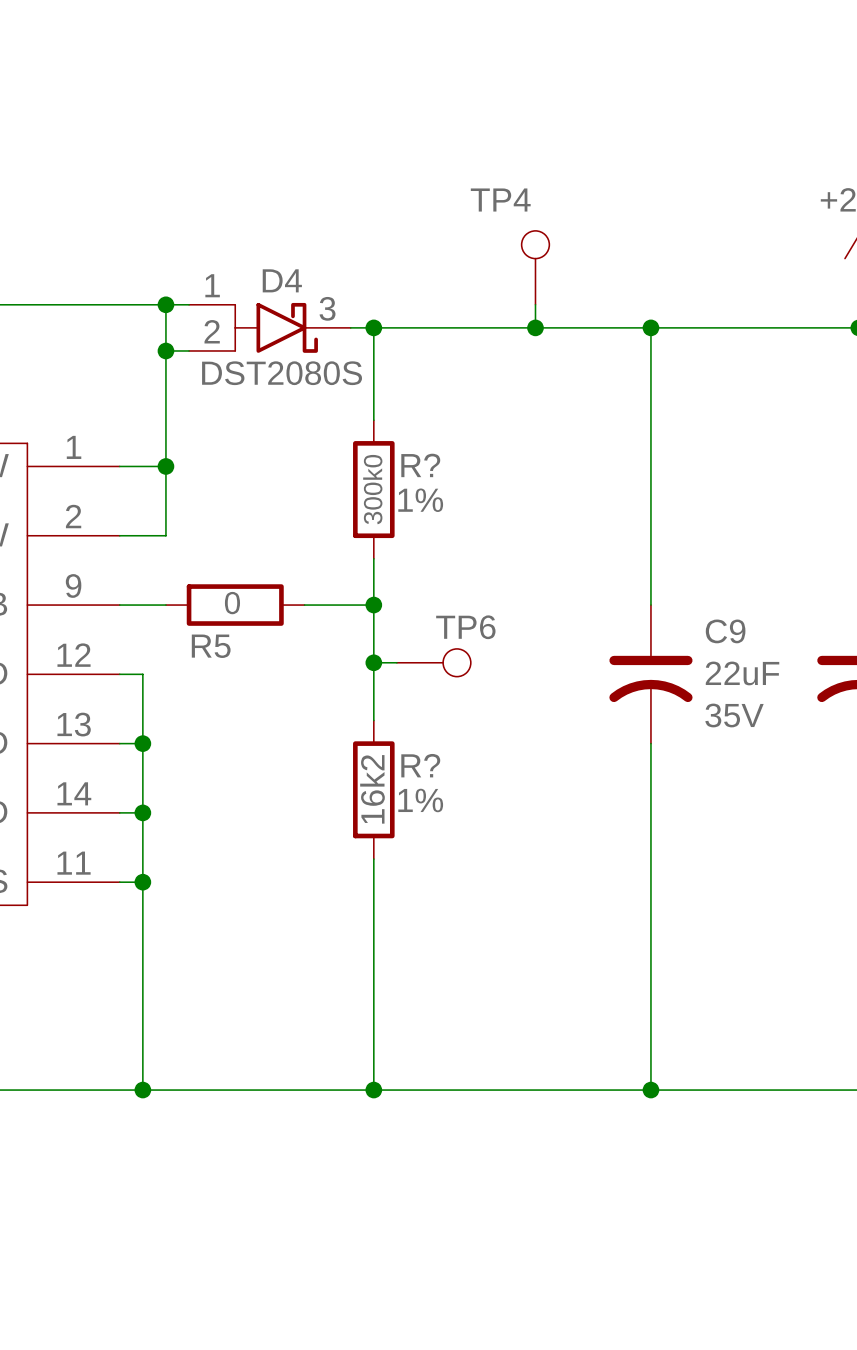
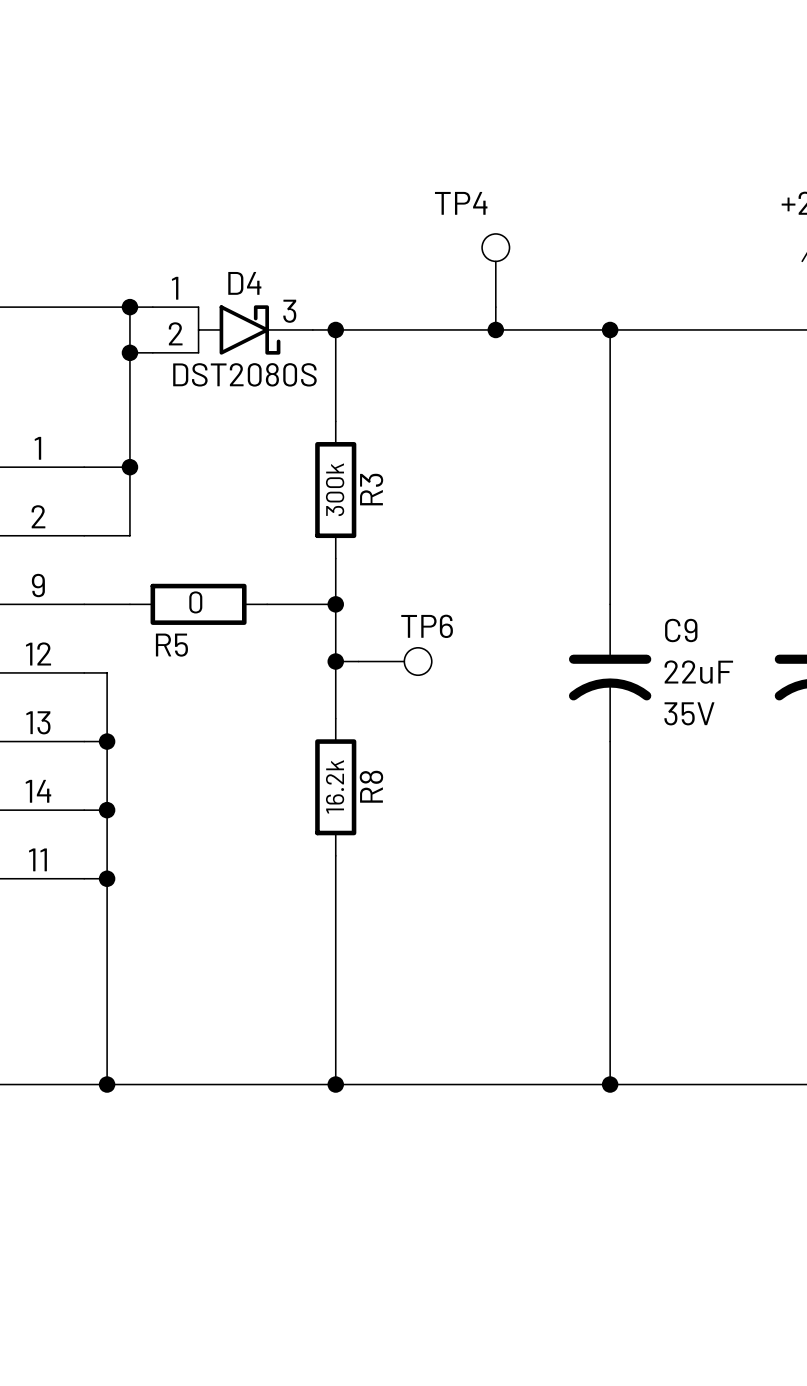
R? name: R? (420, 465) -> R3 (371, 489)
R? text: 300k0 (372, 489) -> none
R? value: none -> 300k (335, 489)
R? text: 1% (420, 500) -> none
R? name: R? (420, 765) -> R8 (371, 786)
R? value: none -> 16.2k (335, 786)
R? text: 16k2 (372, 789) -> none
R? text: 1% (420, 800) -> none

